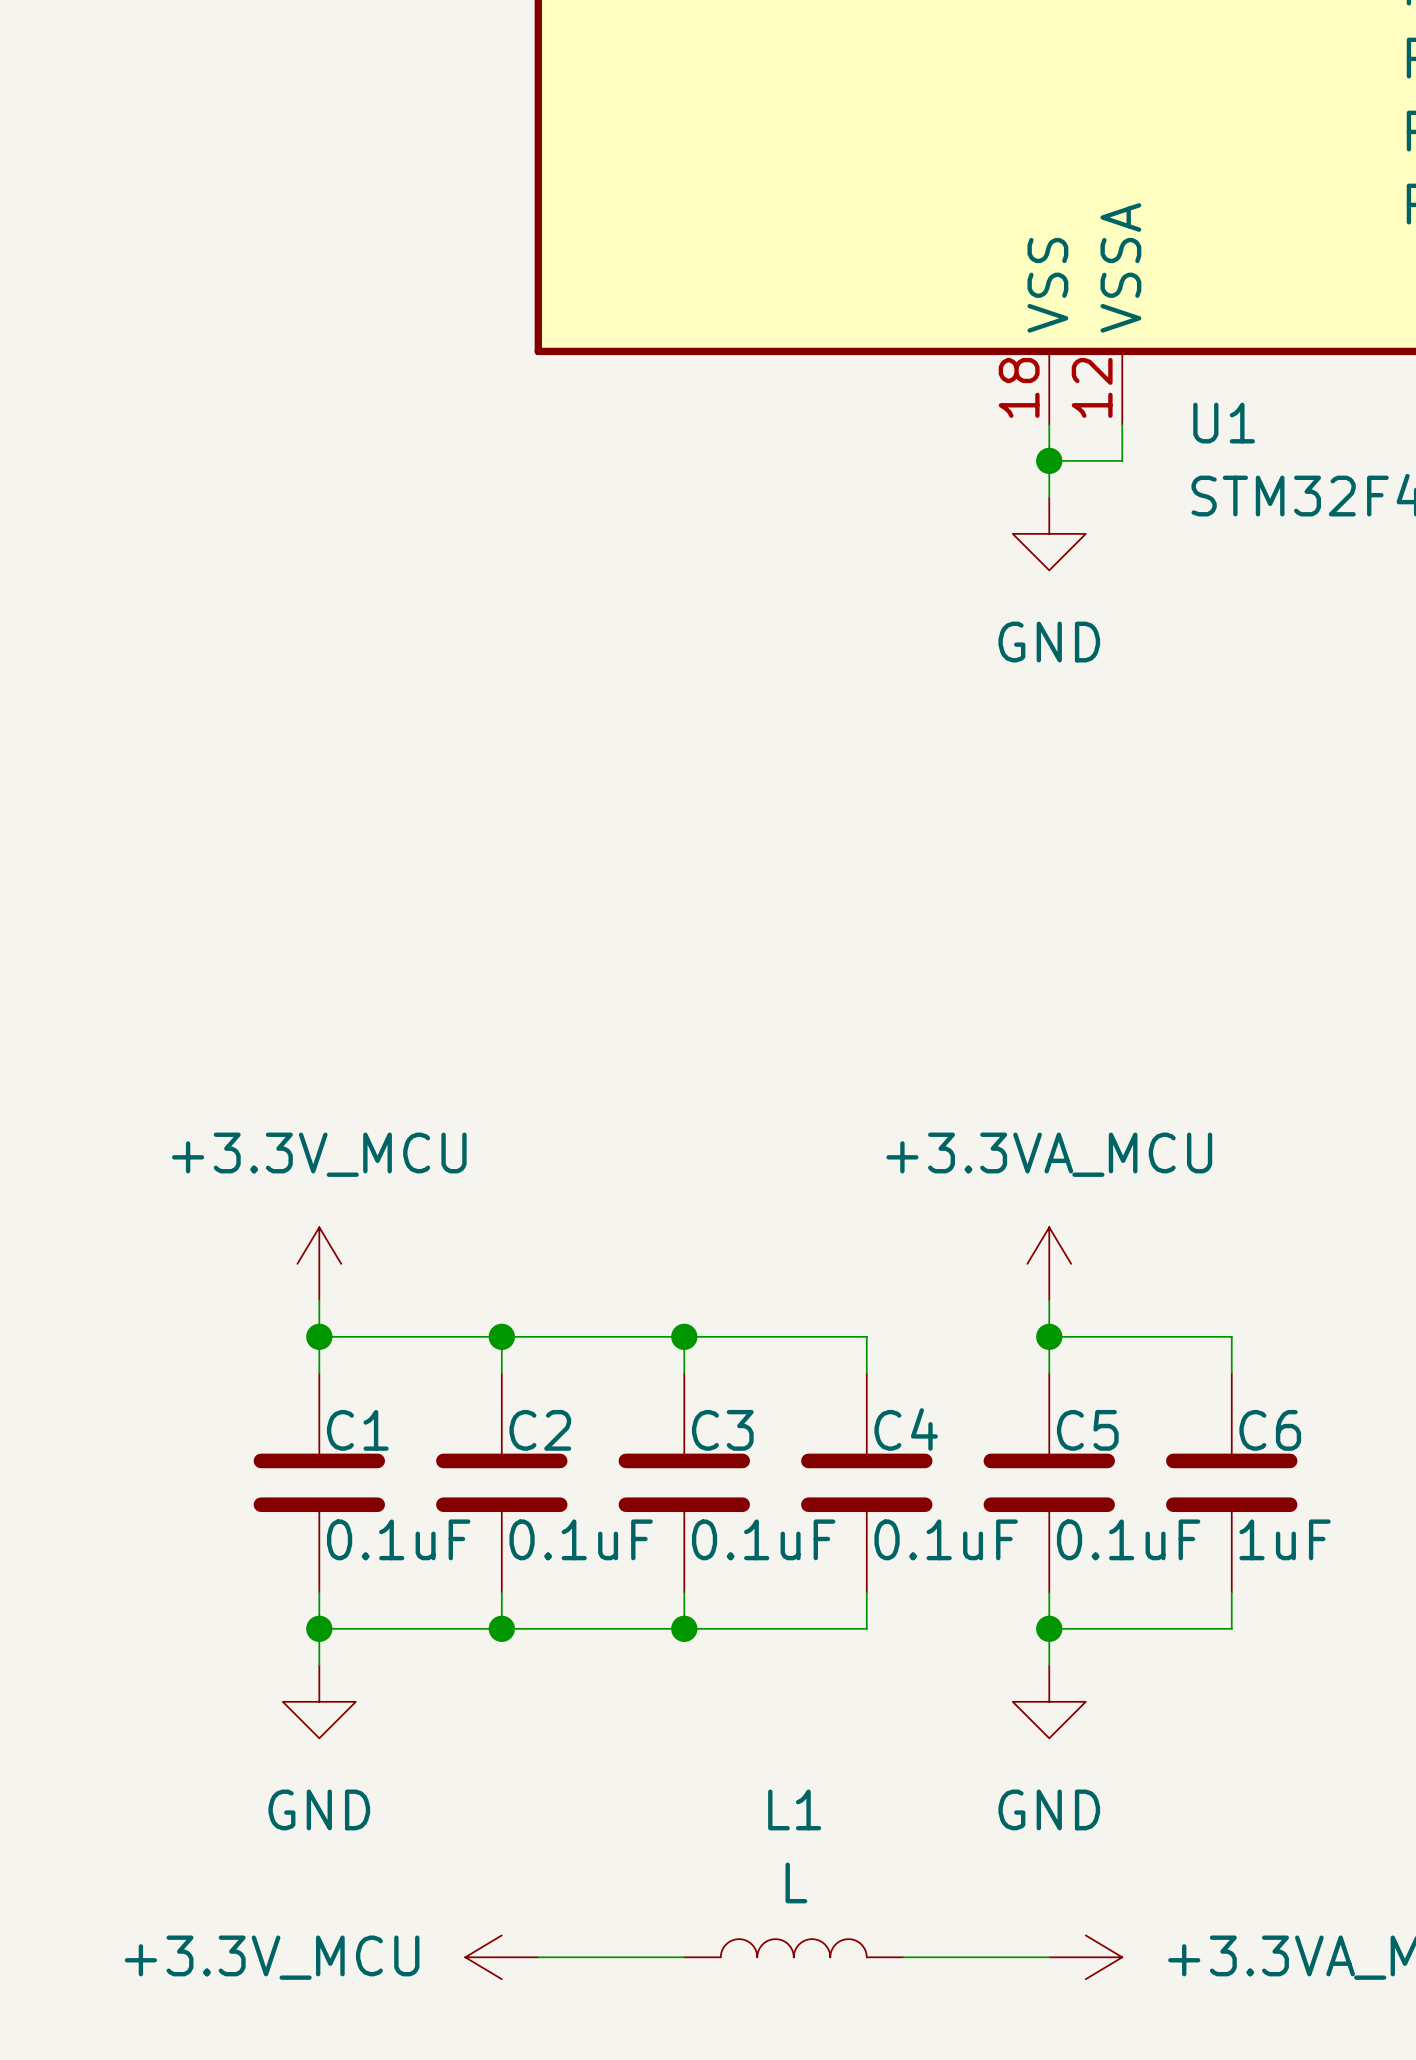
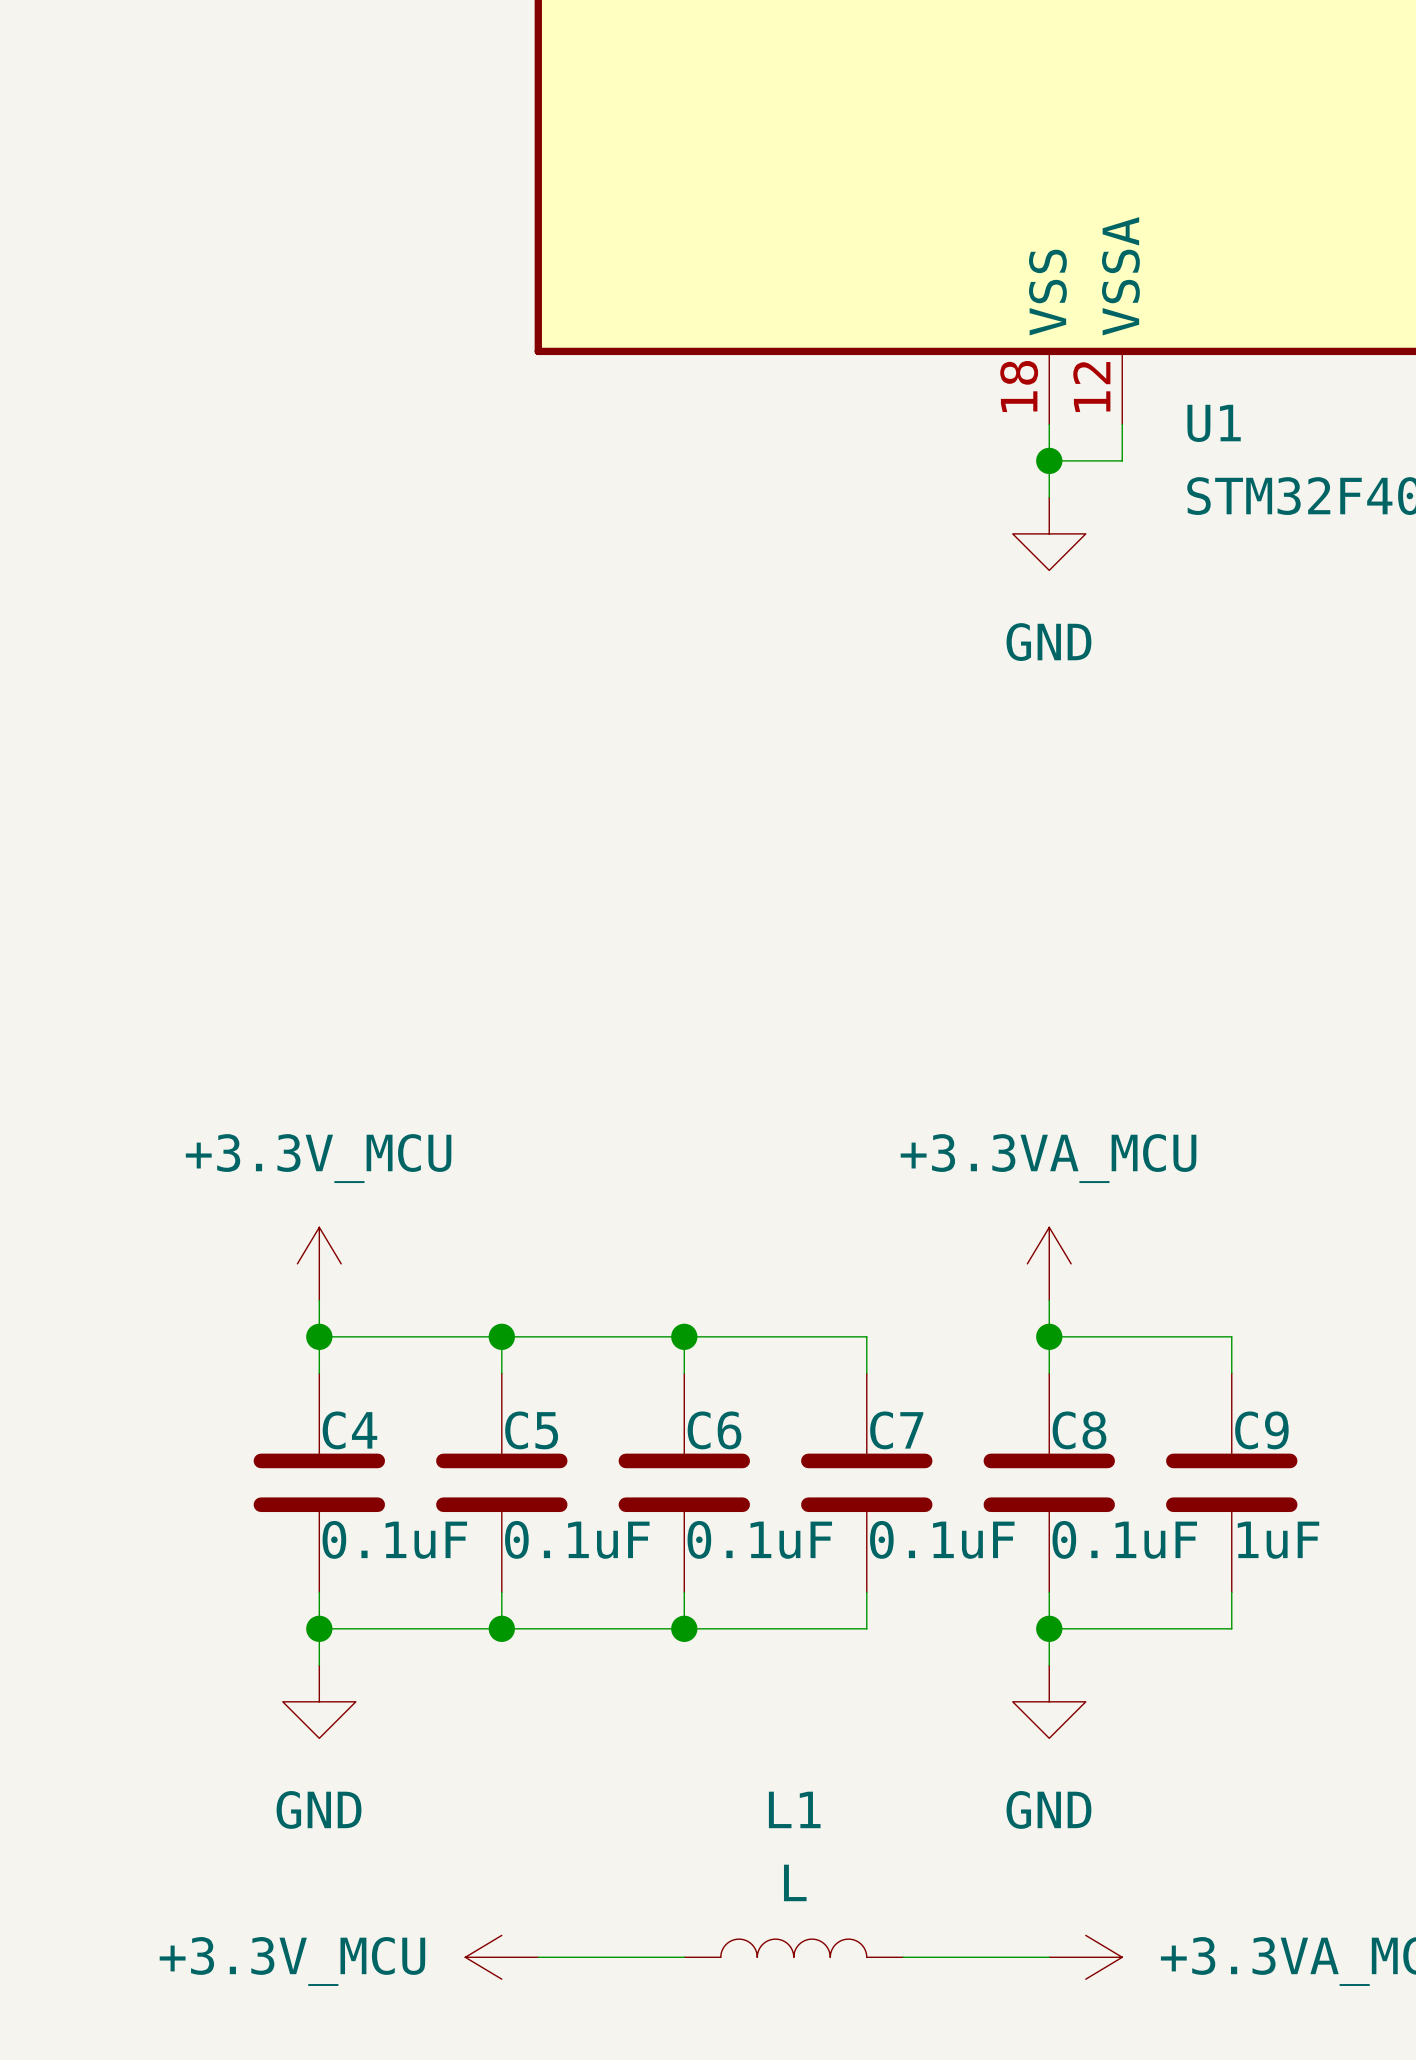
C4 name: C4 (906, 1429) -> C7 (896, 1430)
C1 name: C1 (357, 1430) -> C4 (349, 1430)
C2 name: C2 (540, 1430) -> C5 (531, 1430)
C3 name: C3 (722, 1430) -> C6 (714, 1430)
C5 name: C5 (1087, 1430) -> C8 (1079, 1430)
C6 name: C6 (1270, 1430) -> C9 (1261, 1430)

